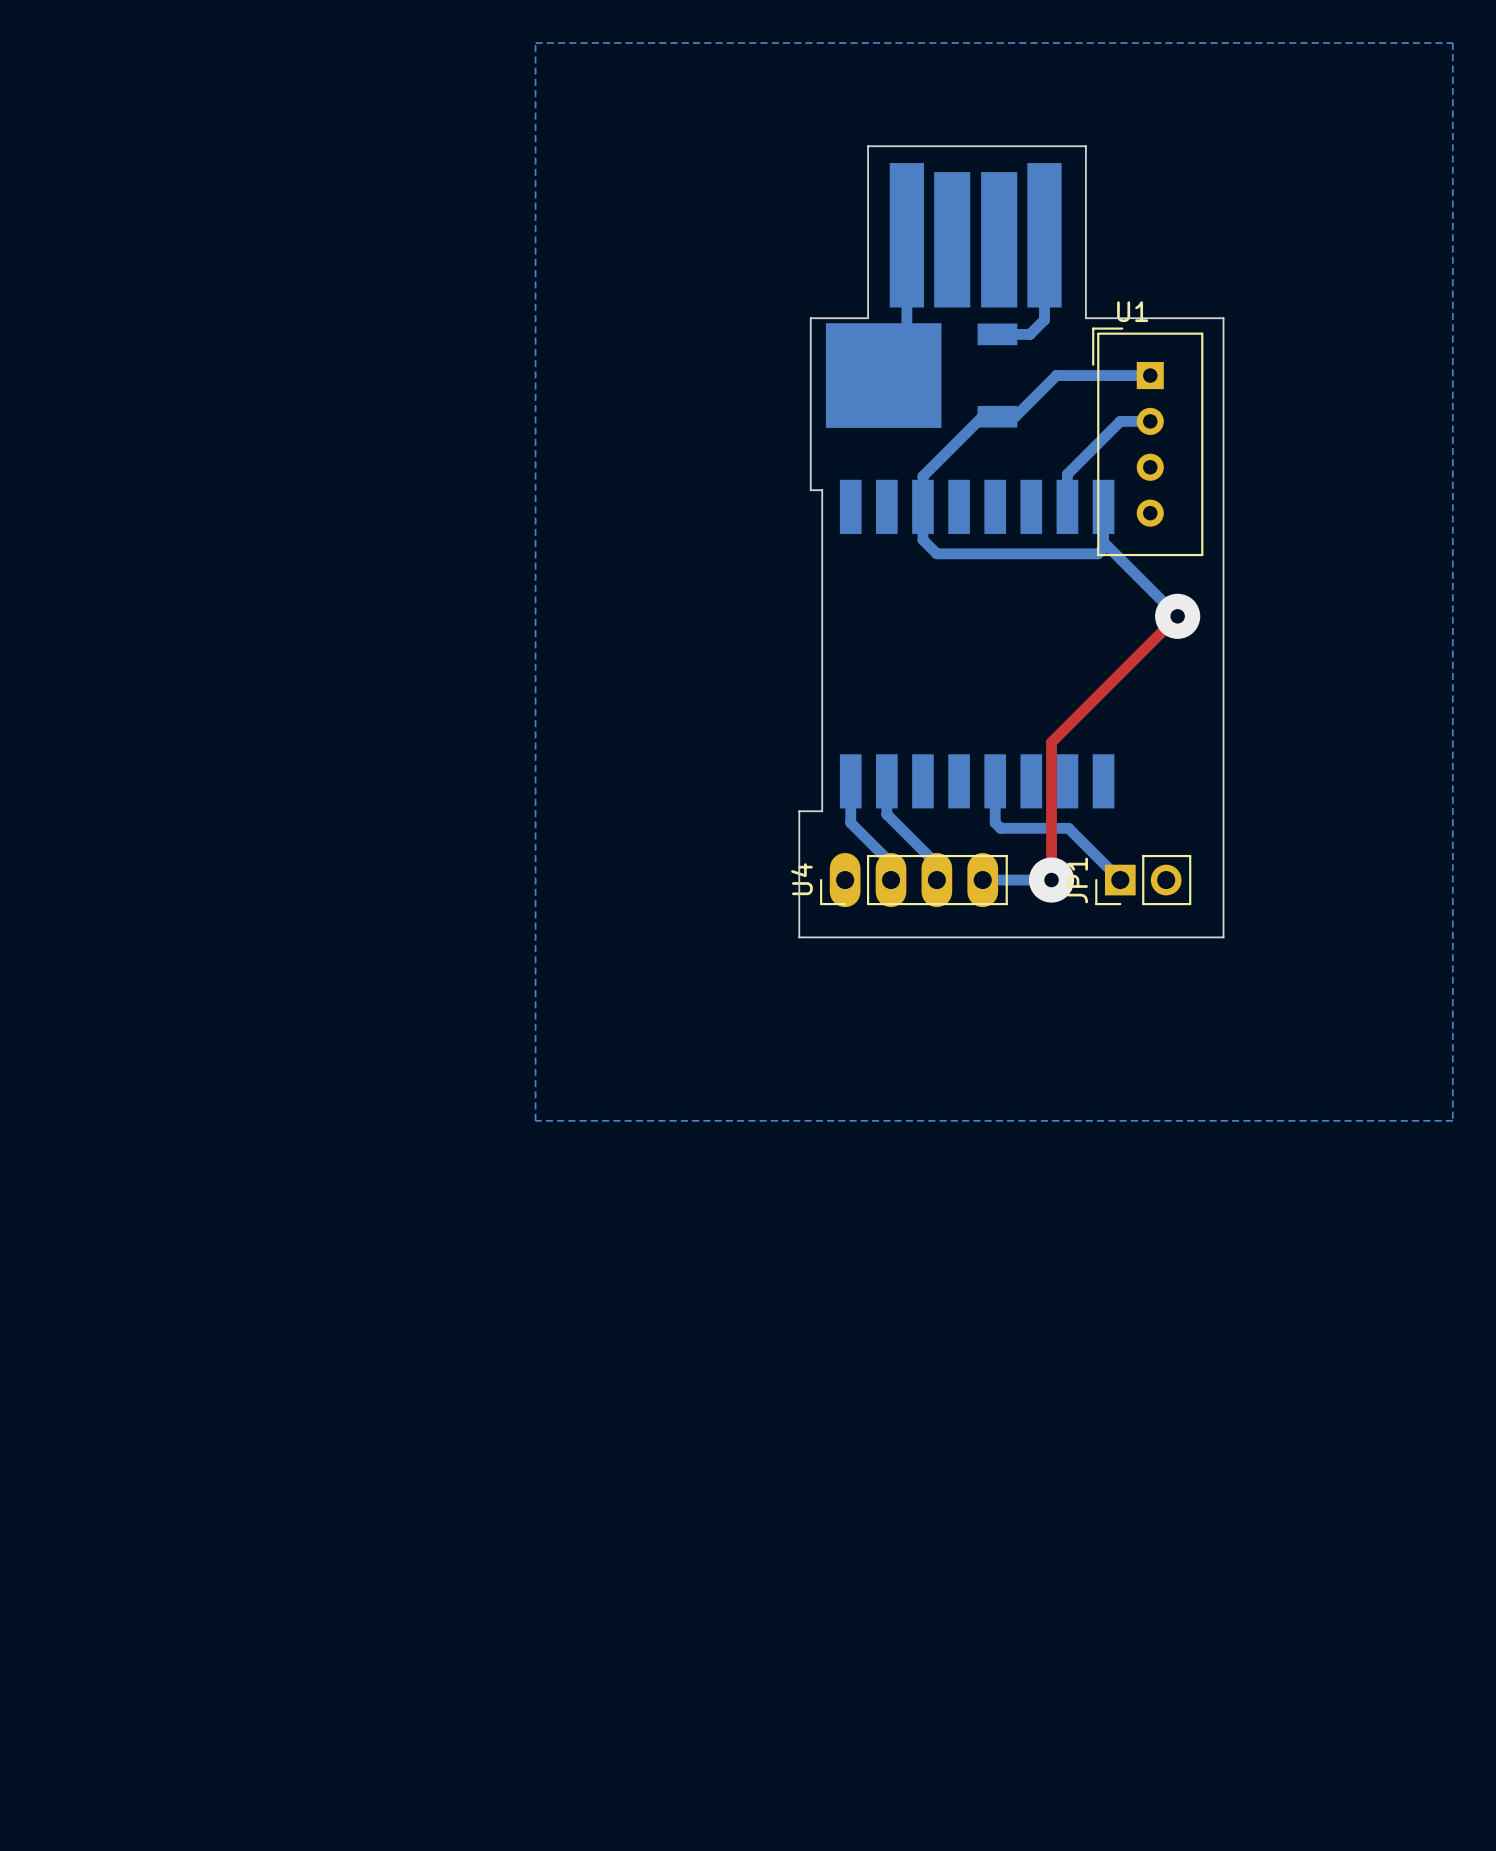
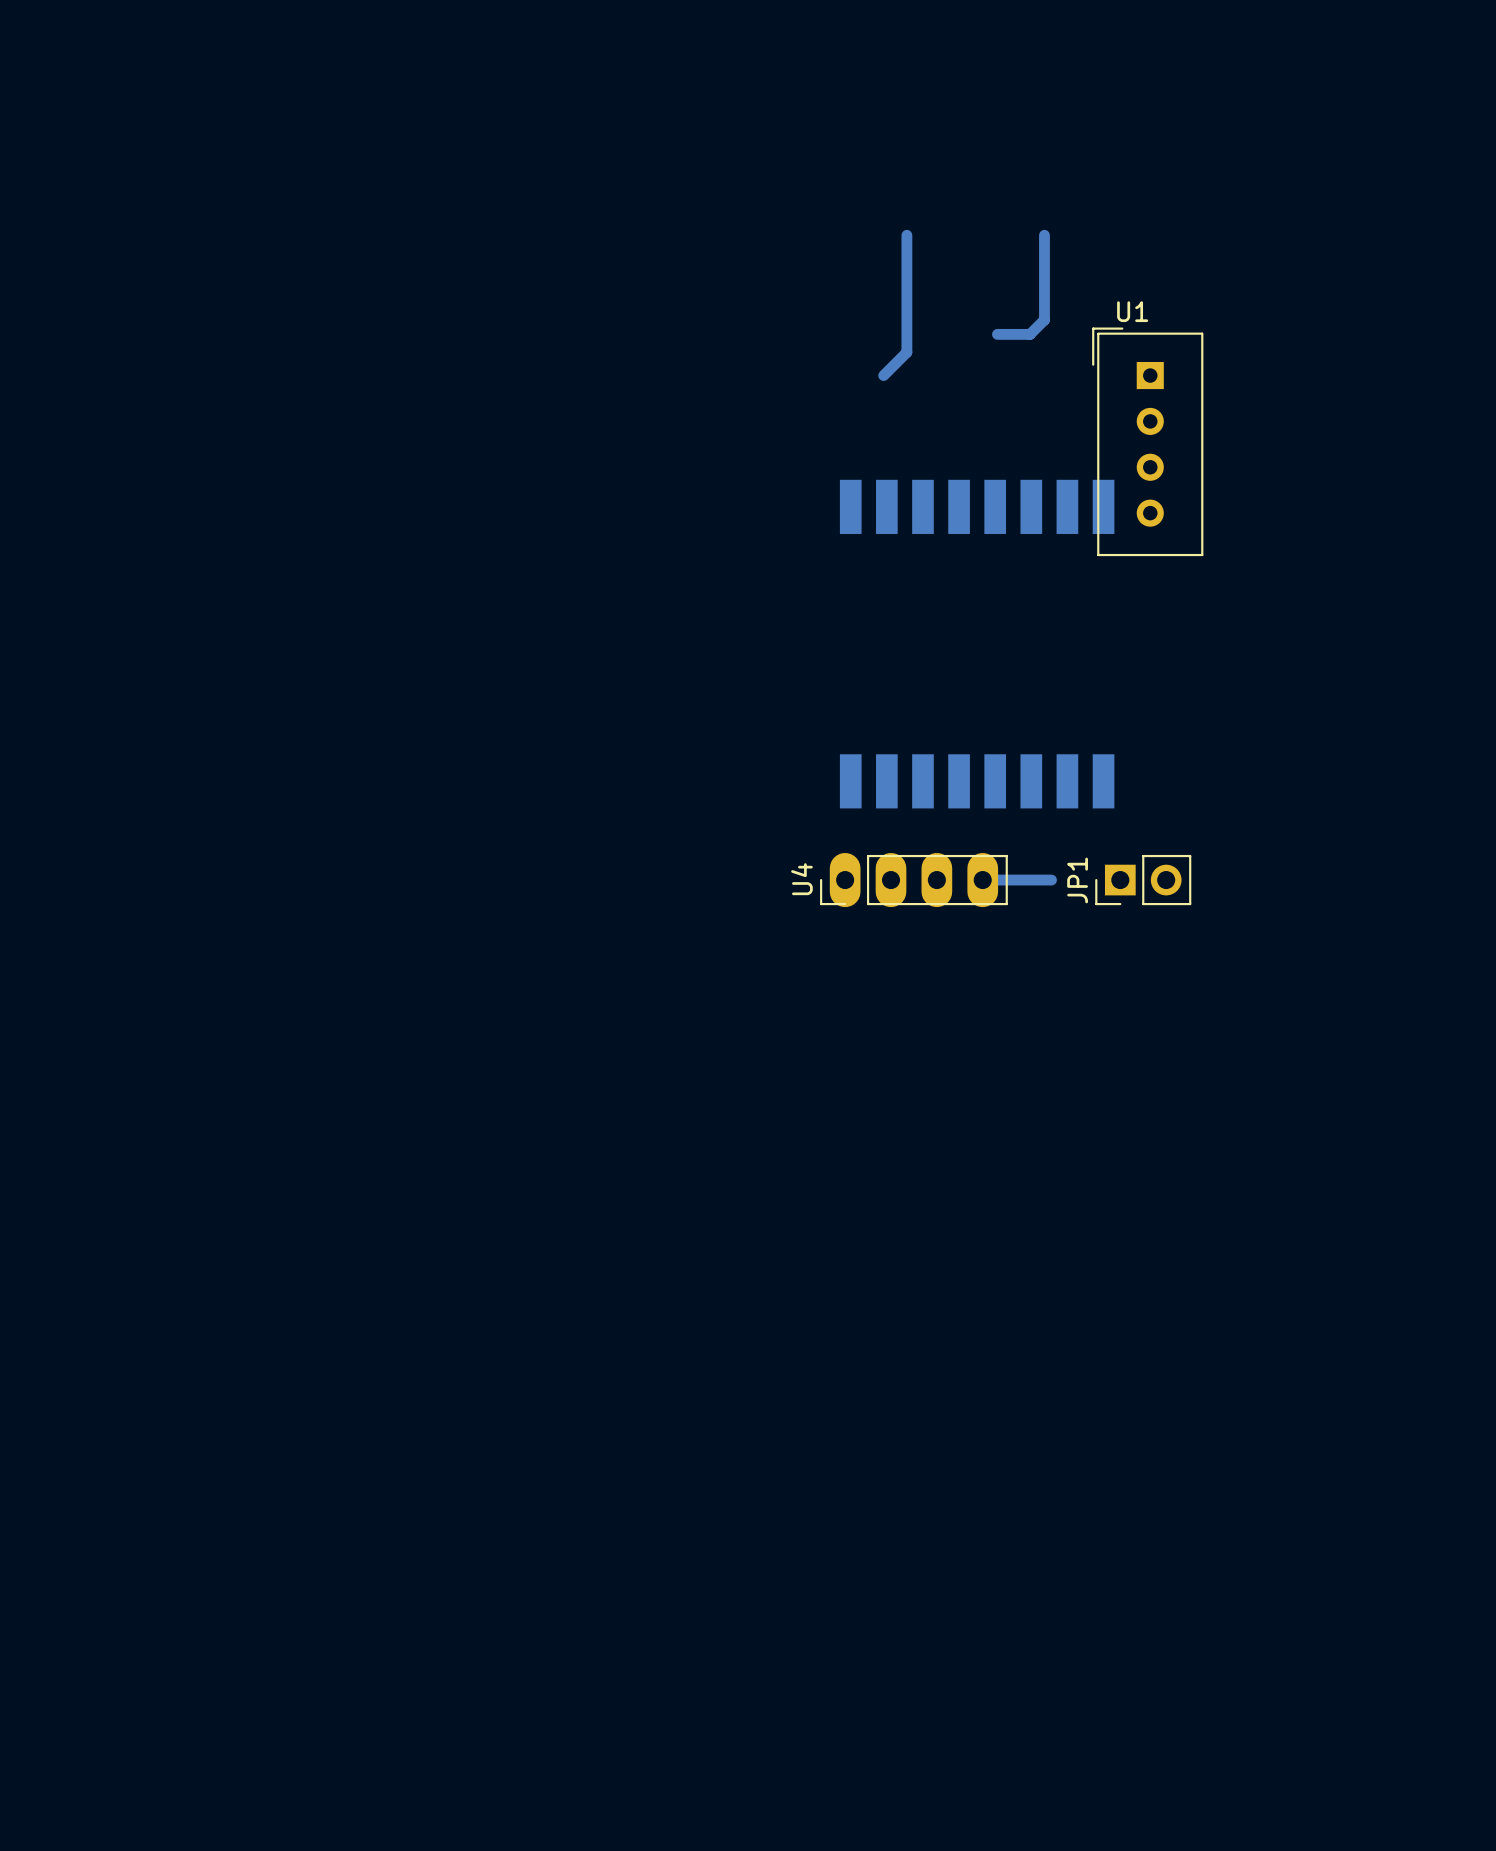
bottom zone outline: (535, 43) (535, 1120) (1452, 1120) (1452, 43) (535, 43) -> none
board edge: (868, 146) (868, 318) (810, 318) (810, 490) (822, 490) (822, 811) (799, 811) (799, 937) (1223, 937) (1223, 318) (1085, 318) (1085, 146) (868, 146) -> none
part: (975, 235) -> none
part: (921, 375) -> none
bottom track: (1153, 375) (1056, 375) (1015, 416) (982, 416) (922, 476) (922, 539) (936, 553) (1098, 553) (1103, 548) (1103, 506) -> none
bottom track: (1153, 421) (1120, 421) (1067, 474) (1067, 506) -> none
bottom track: (1103, 542) (1177, 616) -> none
top track: (1177, 616) (1051, 742) (1051, 880) -> none
via: (1177, 616) -> none
bottom track: (850, 781) (850, 822) (891, 863) (891, 880) -> none
bottom track: (886, 781) (886, 814) (936, 864) (936, 880) -> none
bottom track: (995, 781) (995, 822) (1000, 828) (1068, 828) (1120, 880) -> none
via: (1051, 880) -> none

